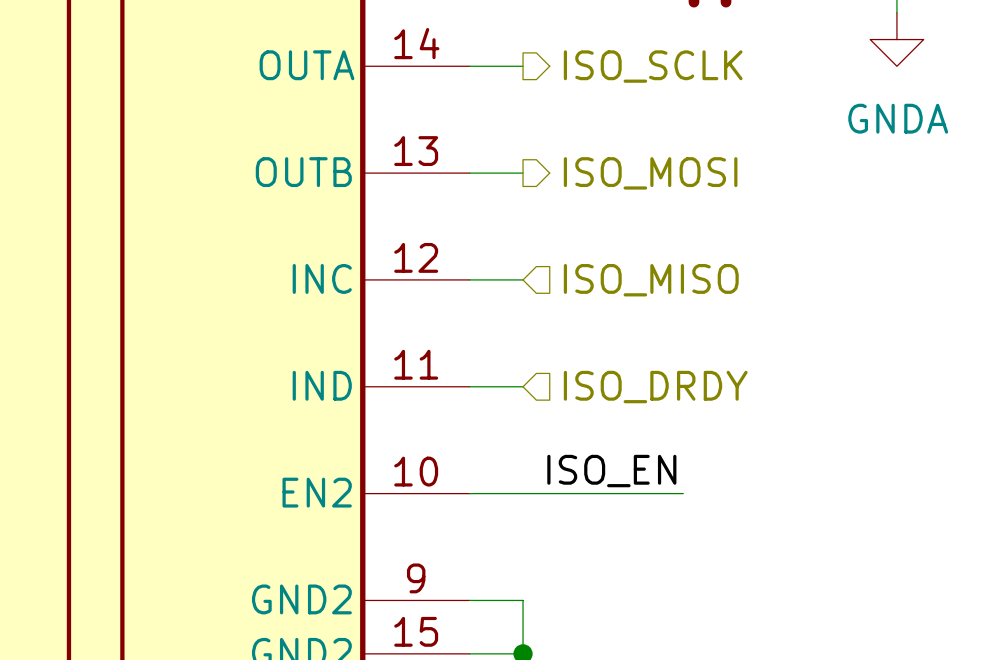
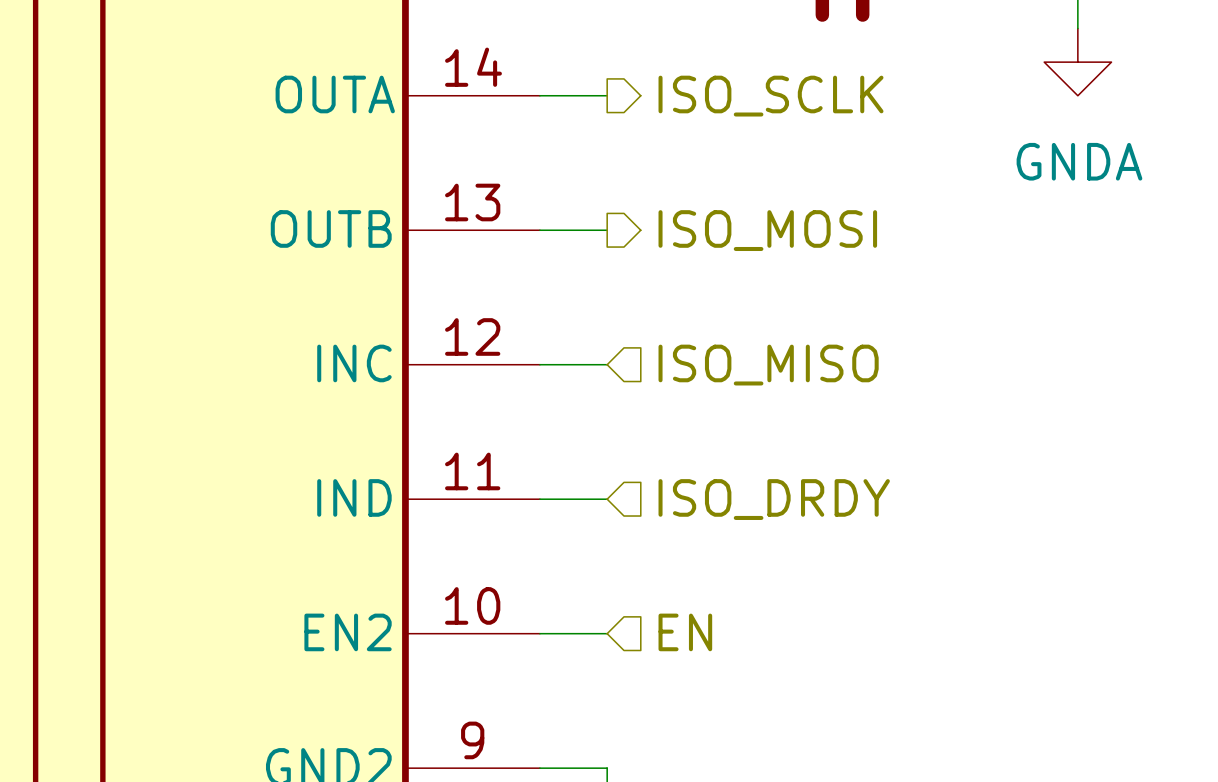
label: ISO_EN (611, 471) -> none
hierarchical label: none -> EN (685, 632)
wire: (523, 493) (683, 493) -> none

